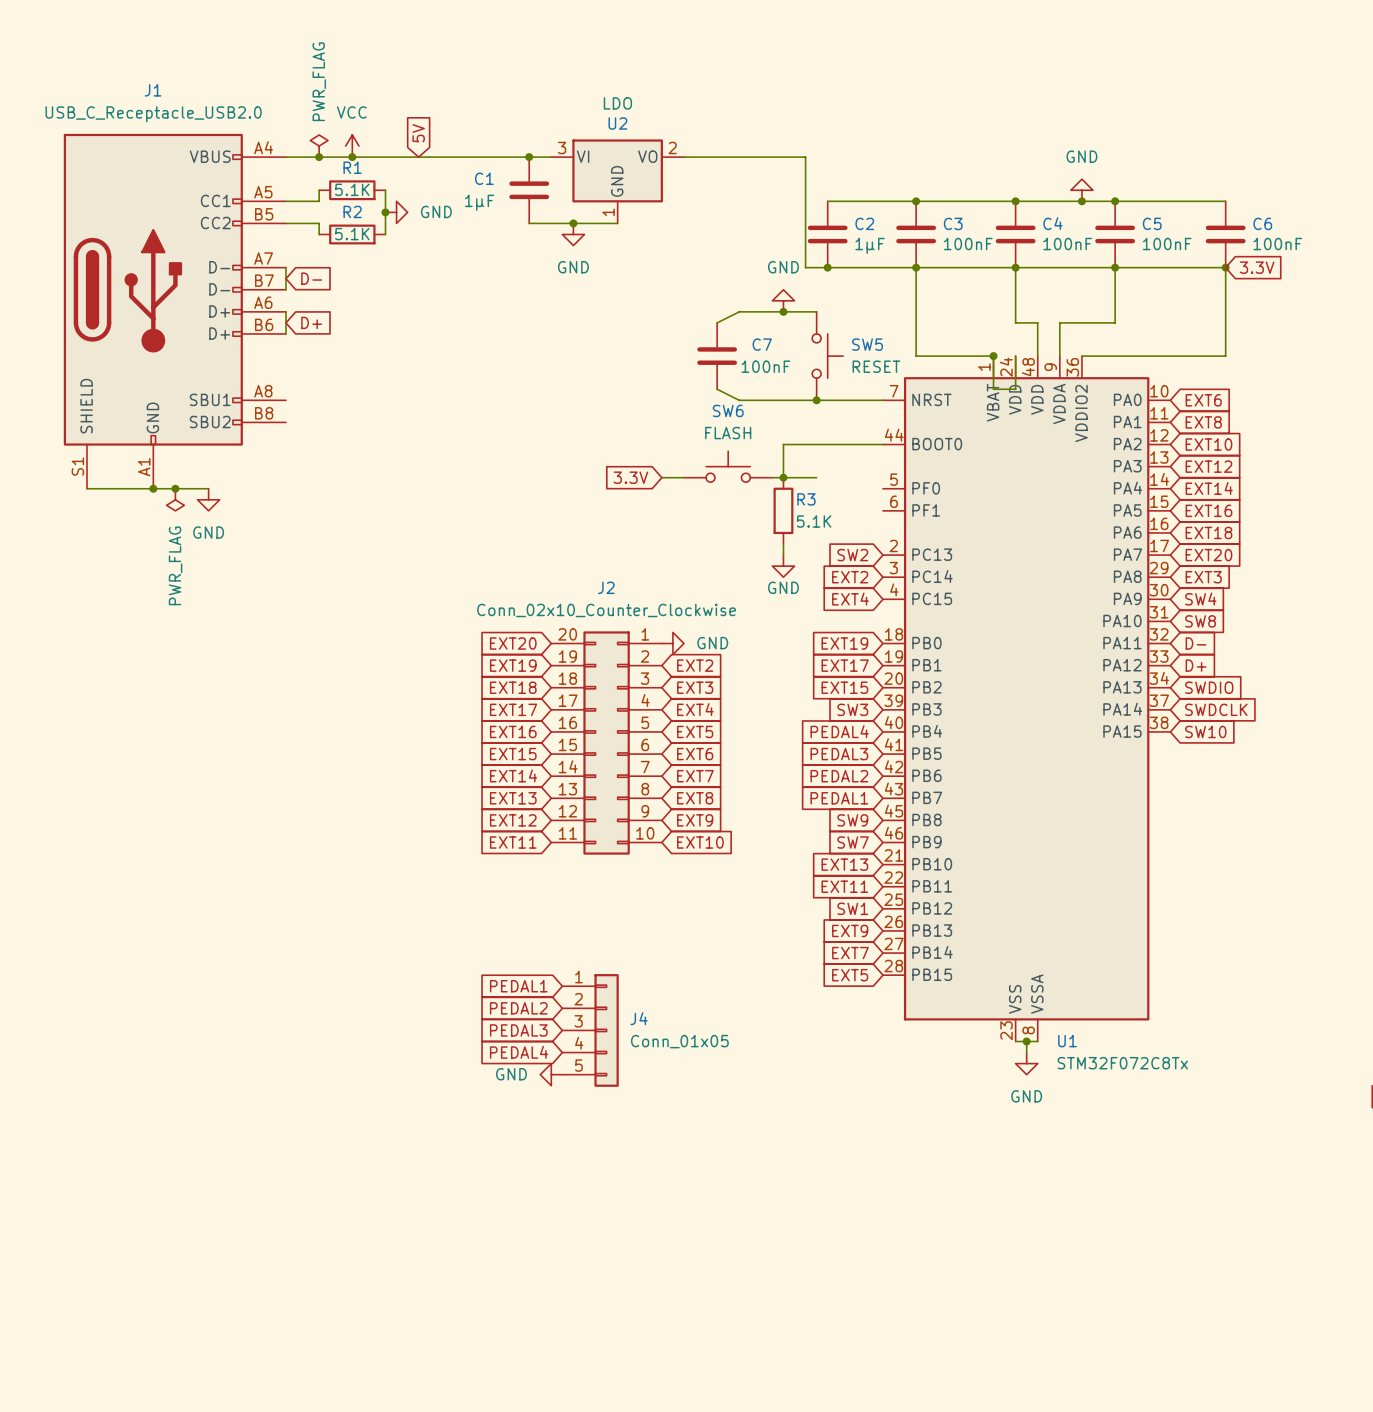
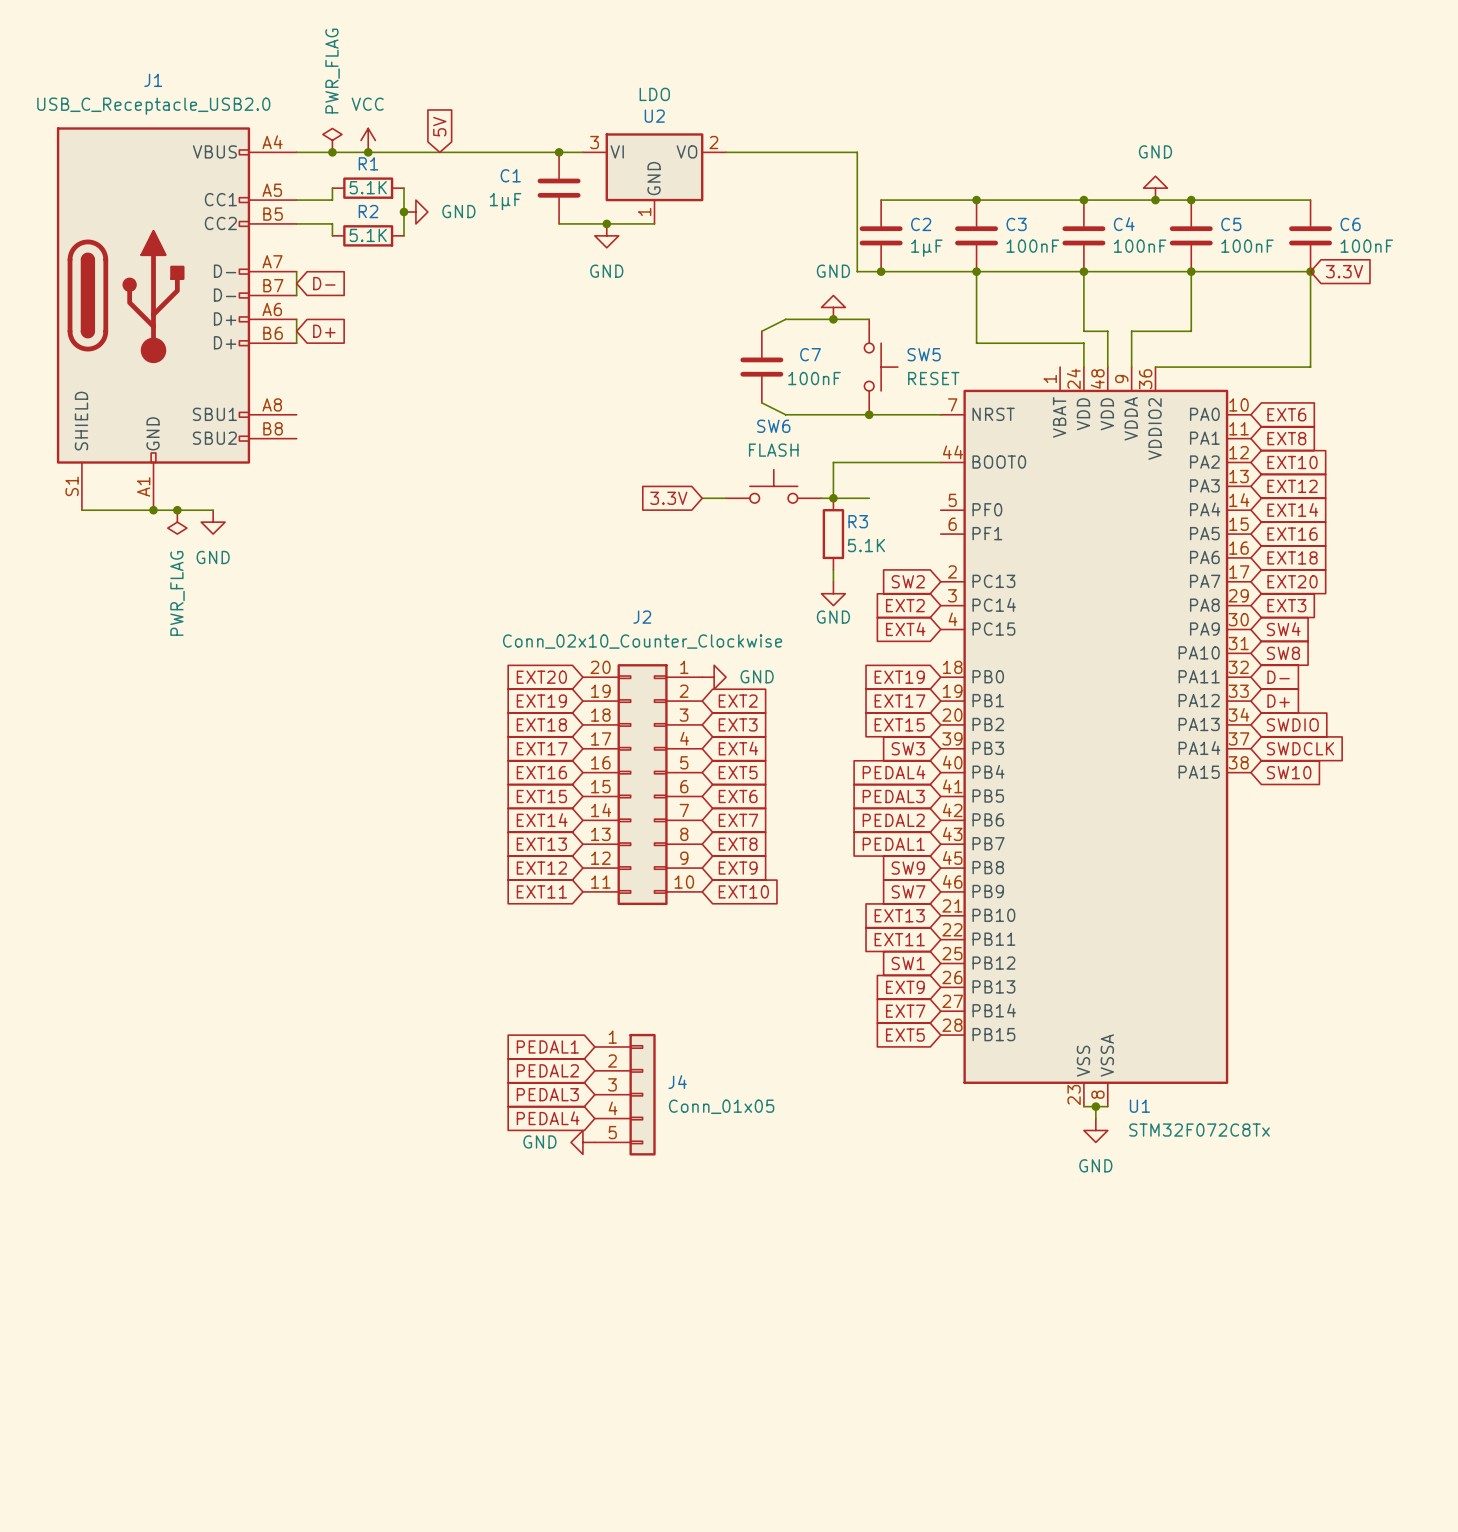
wire: (916, 333) (916, 356) (993, 356) (993, 389) (1015, 389) (1015, 356) -> (976, 343) (1083, 343) (1083, 367)
junction: (993, 356) -> none

